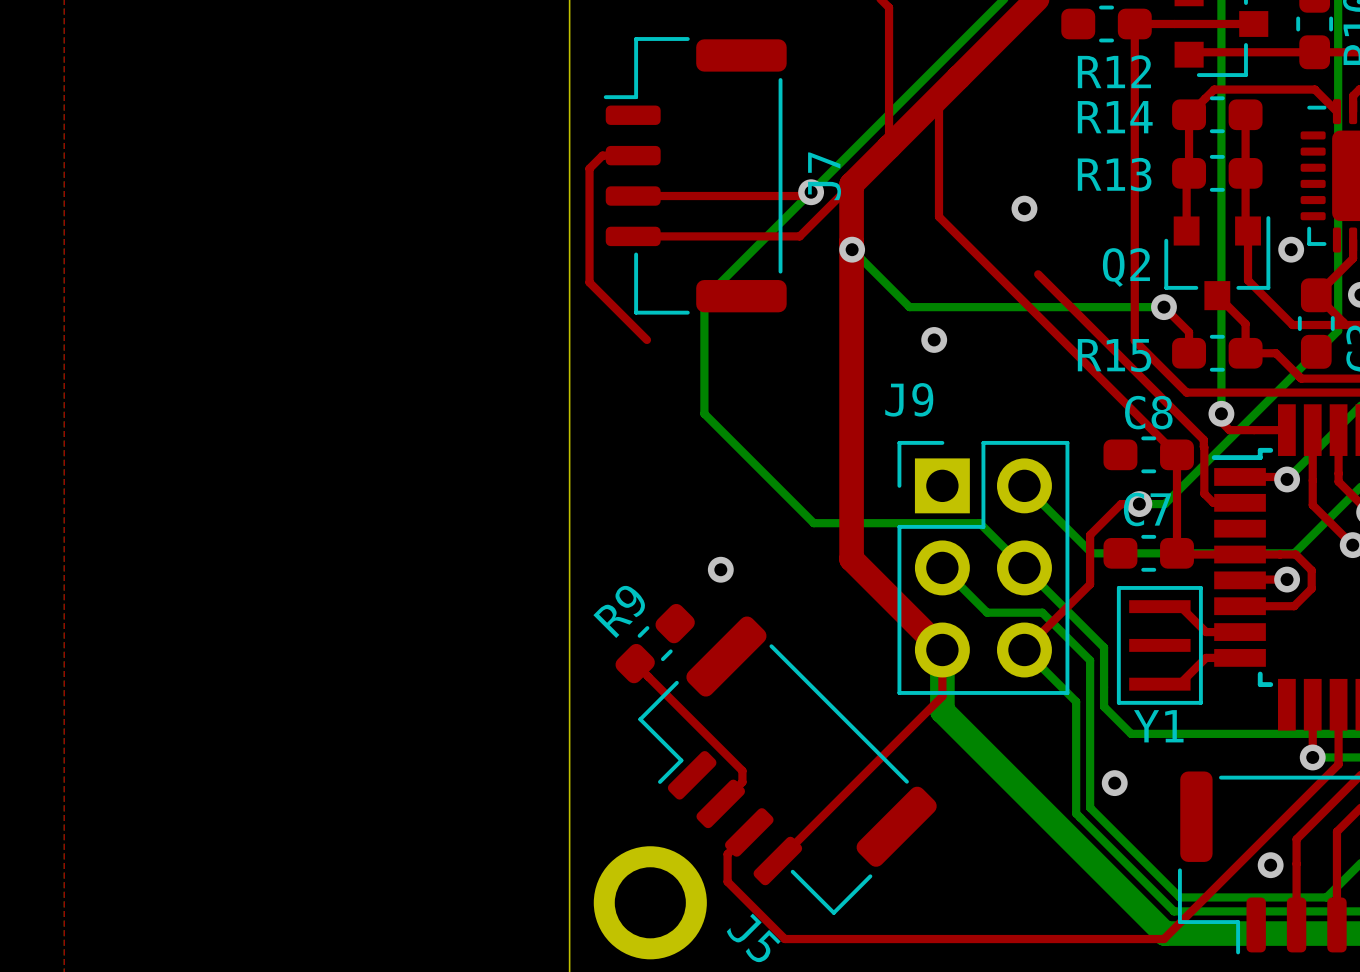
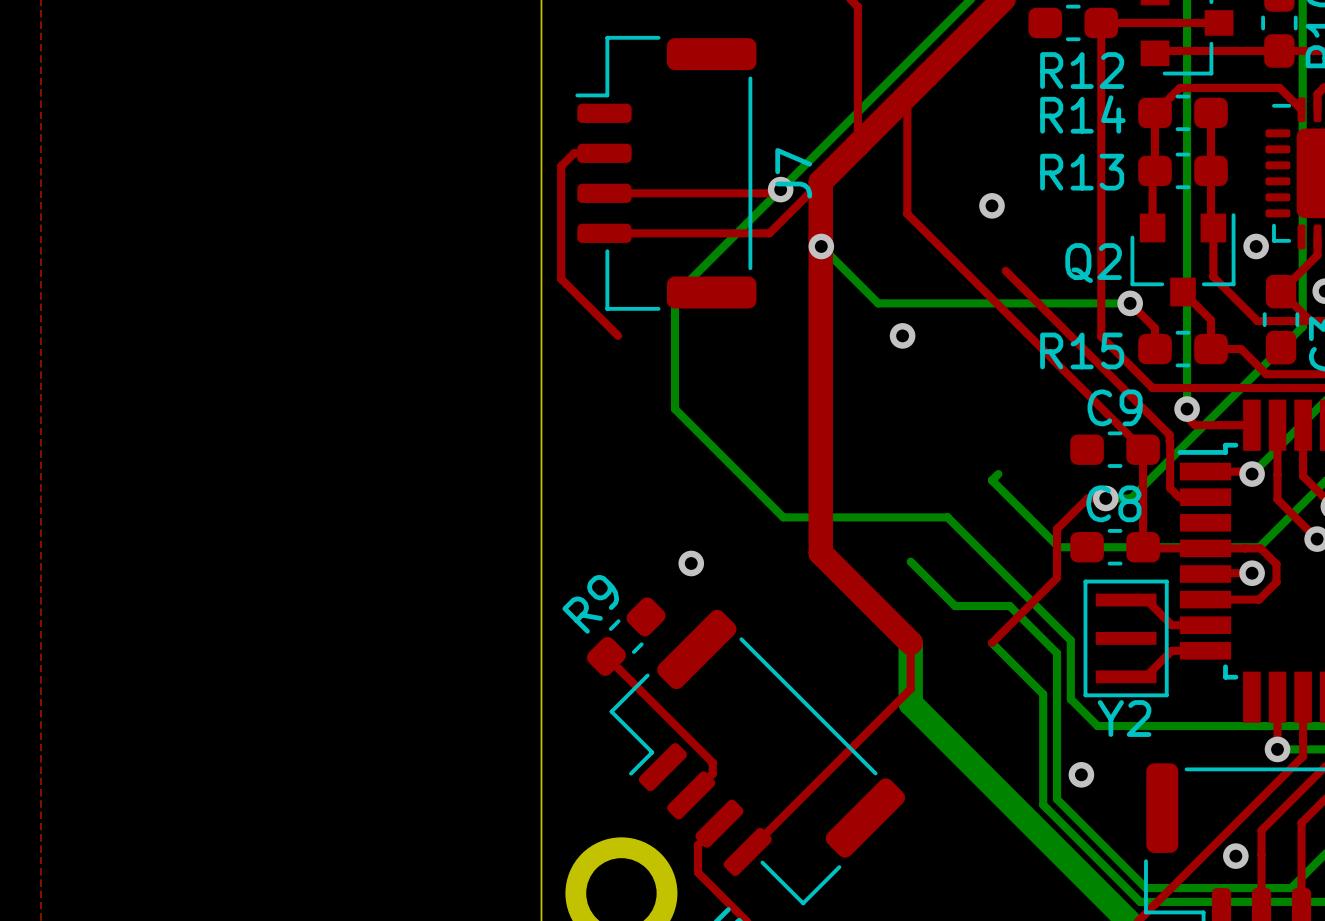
C8 name: C8 (1148, 412) -> C9 (1115, 407)
C7 name: C7 (1147, 509) -> C8 (1113, 503)
J9: (983, 567) -> none
Y1 name: Y1 (1158, 726) -> Y2 (1124, 718)

